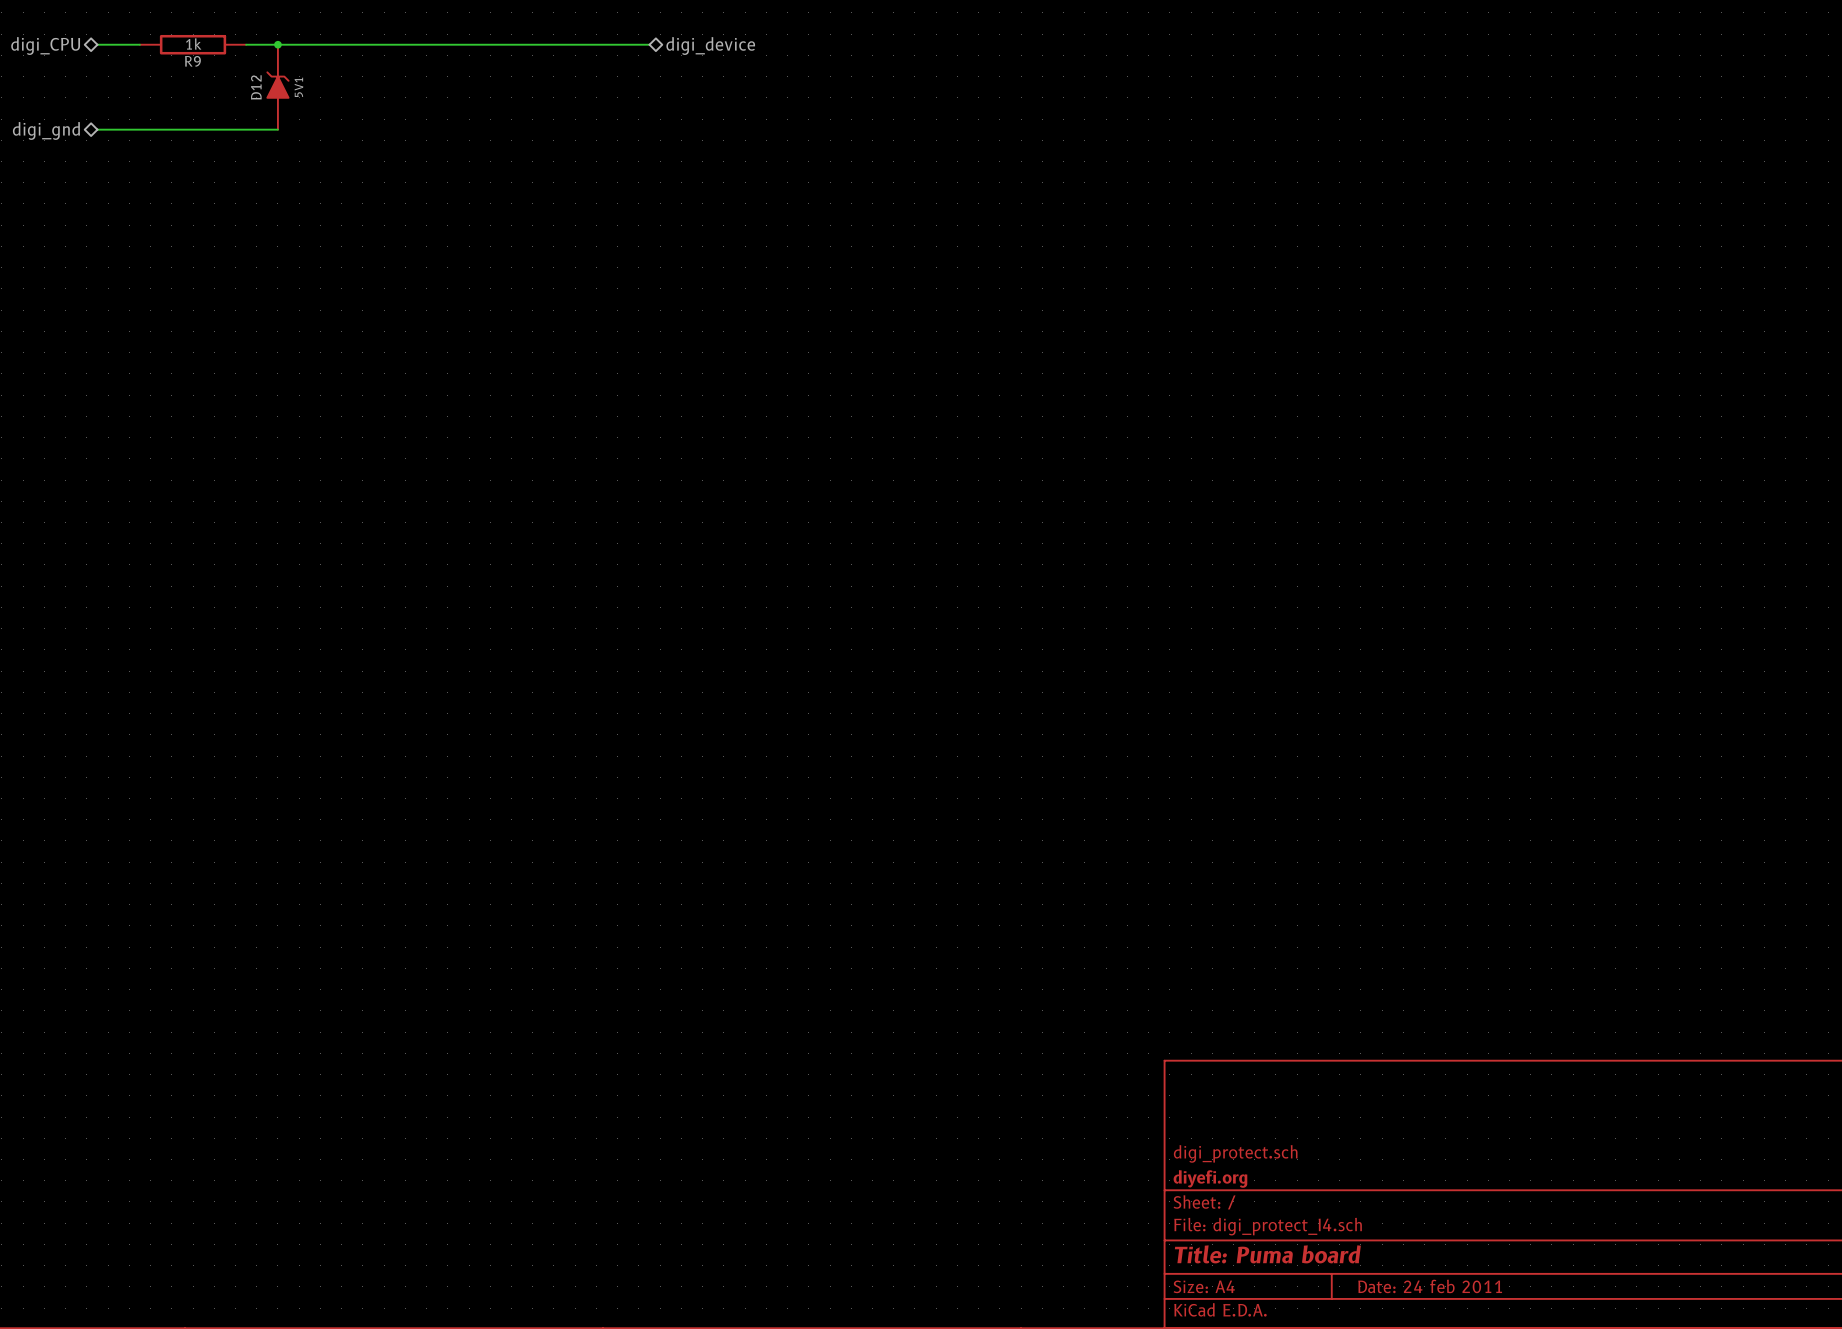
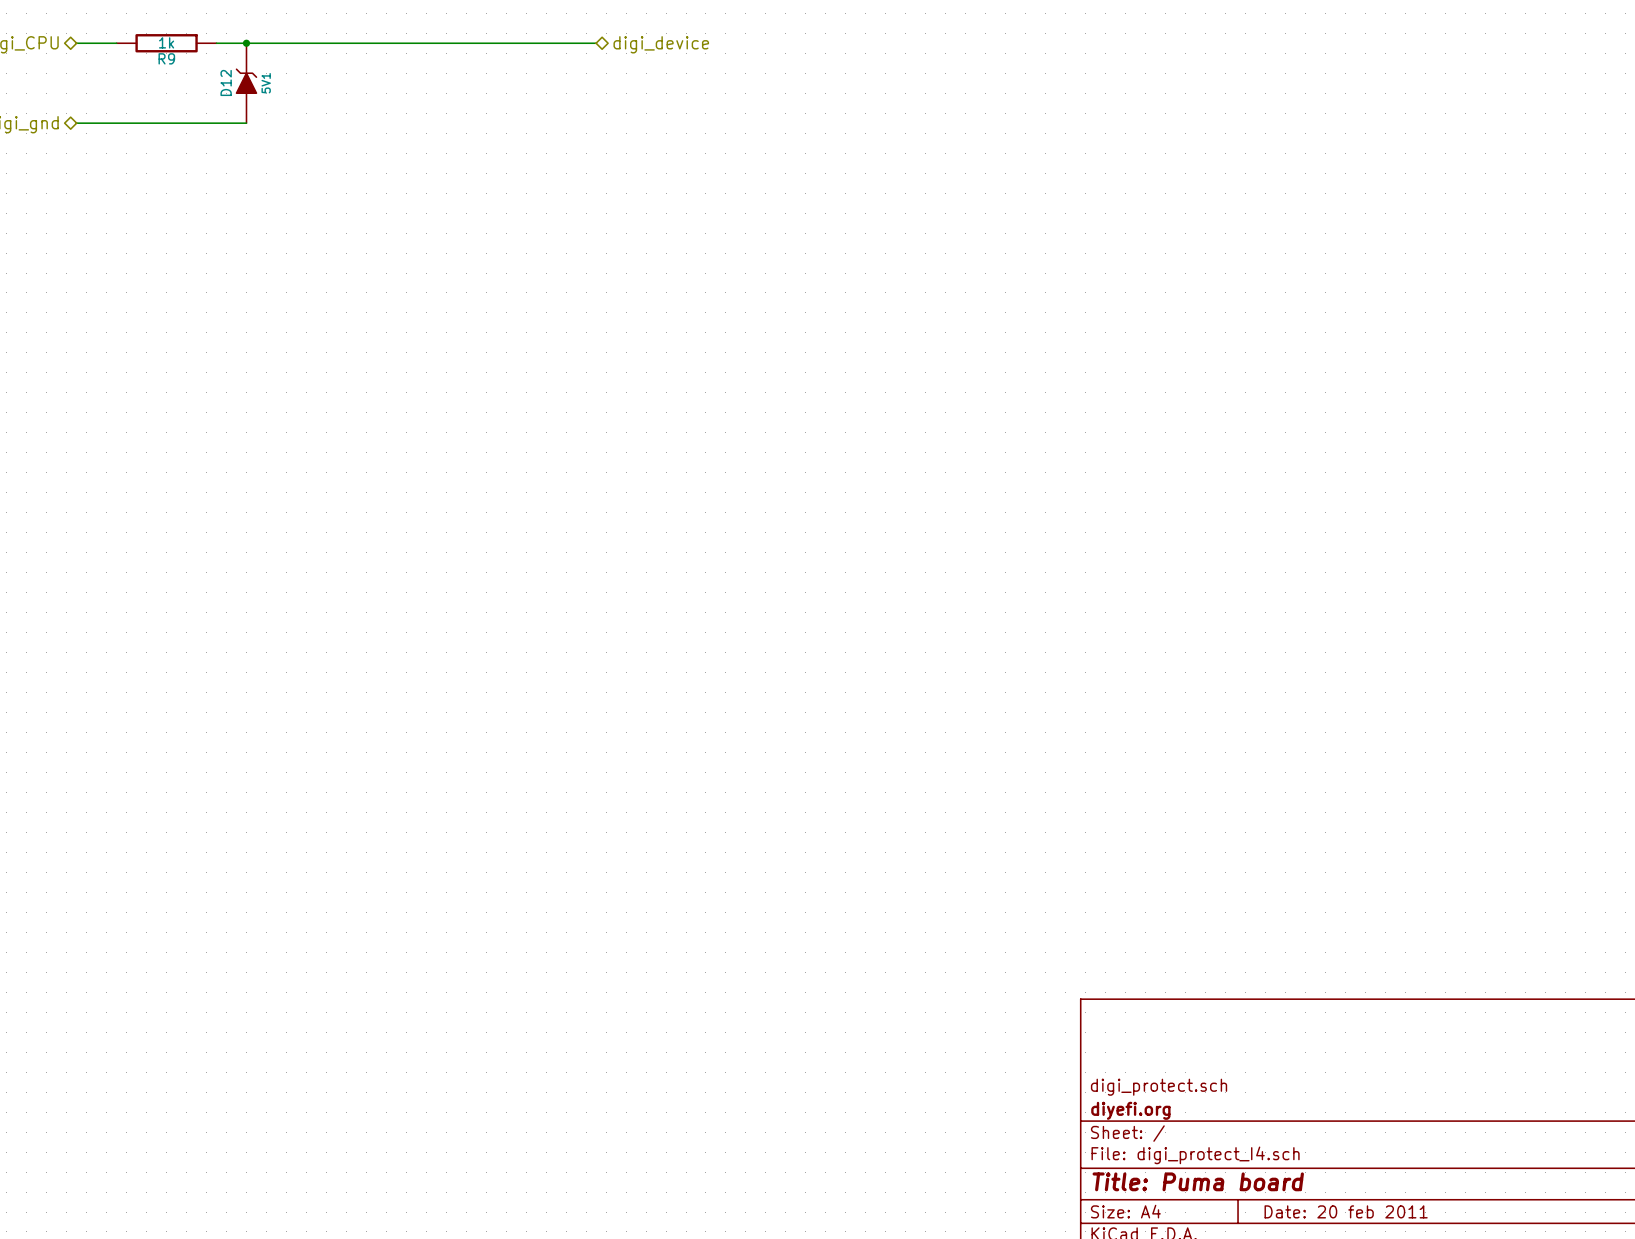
title block: Date: 24 feb 2011 (1430, 1286) -> Date: 20 feb 2011 (1346, 1211)

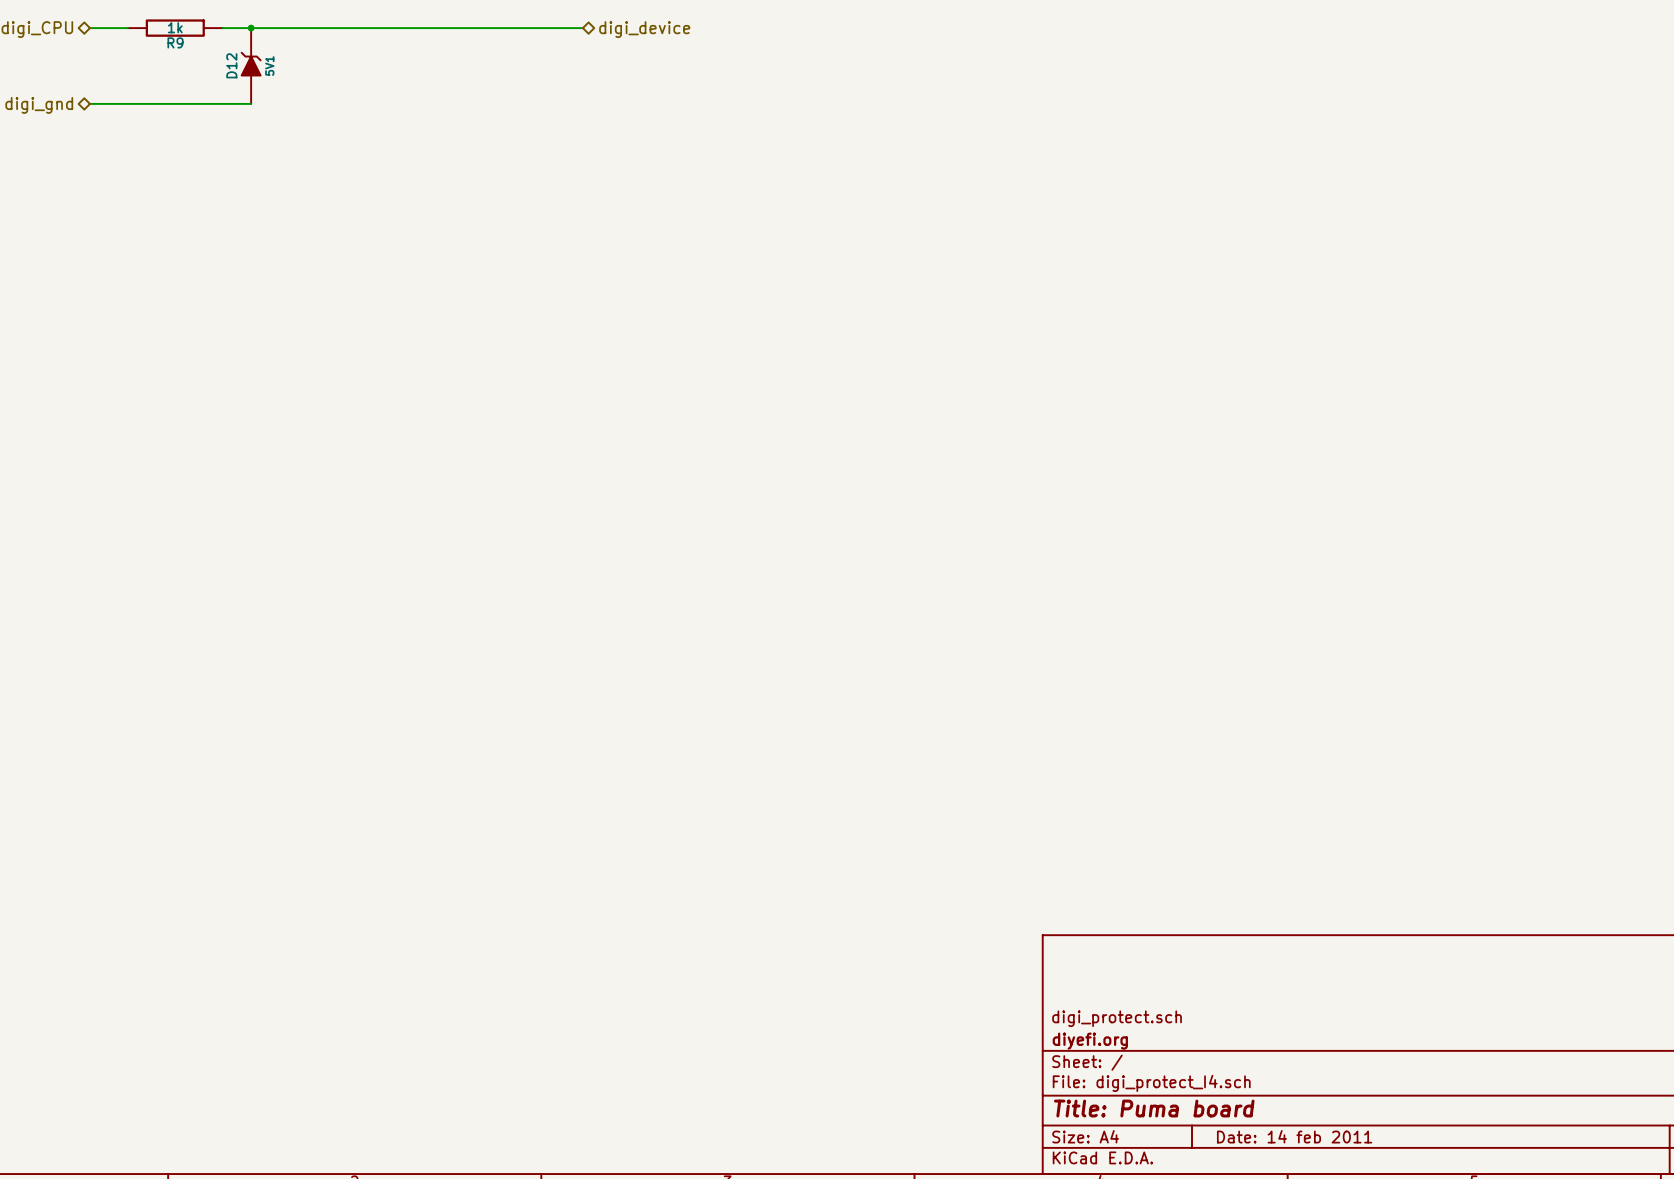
title block: Date: 20 feb 2011 (1346, 1211) -> Date: 14 feb 2011 (1294, 1136)

